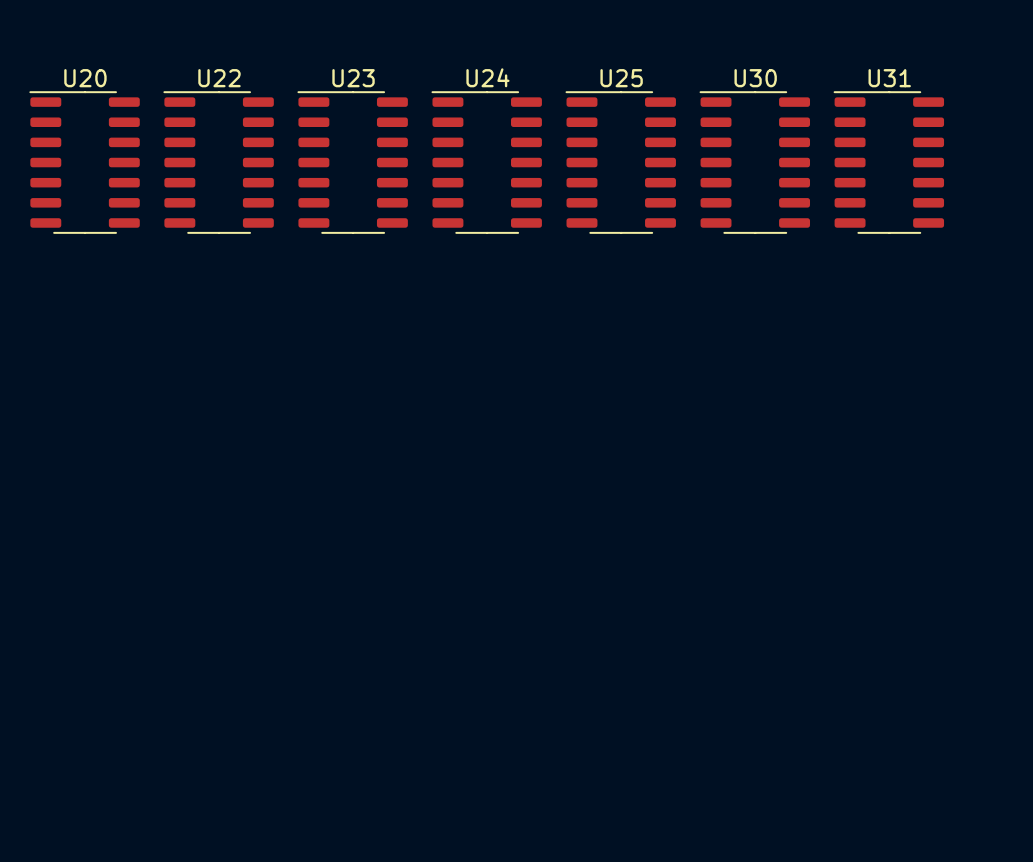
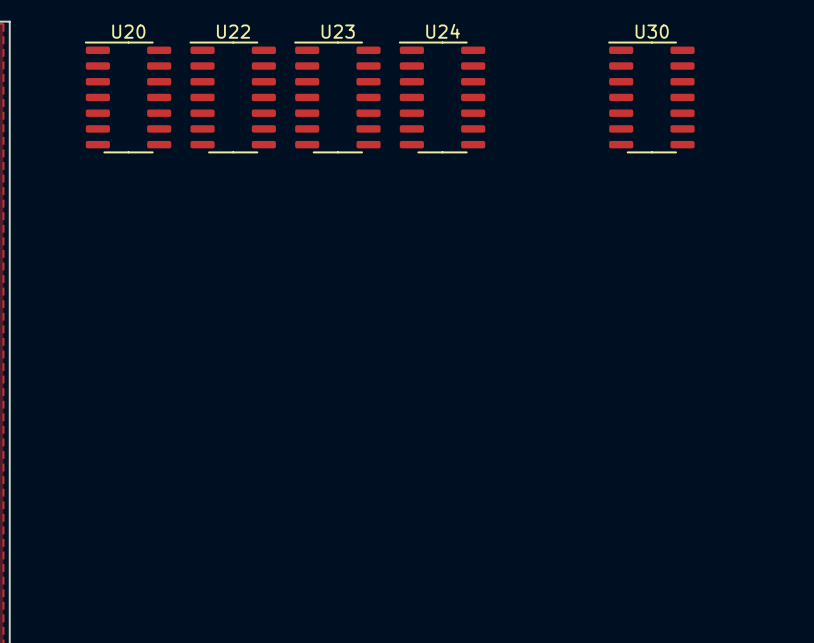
U25: (620, 162) -> none
U31: (888, 162) -> none

